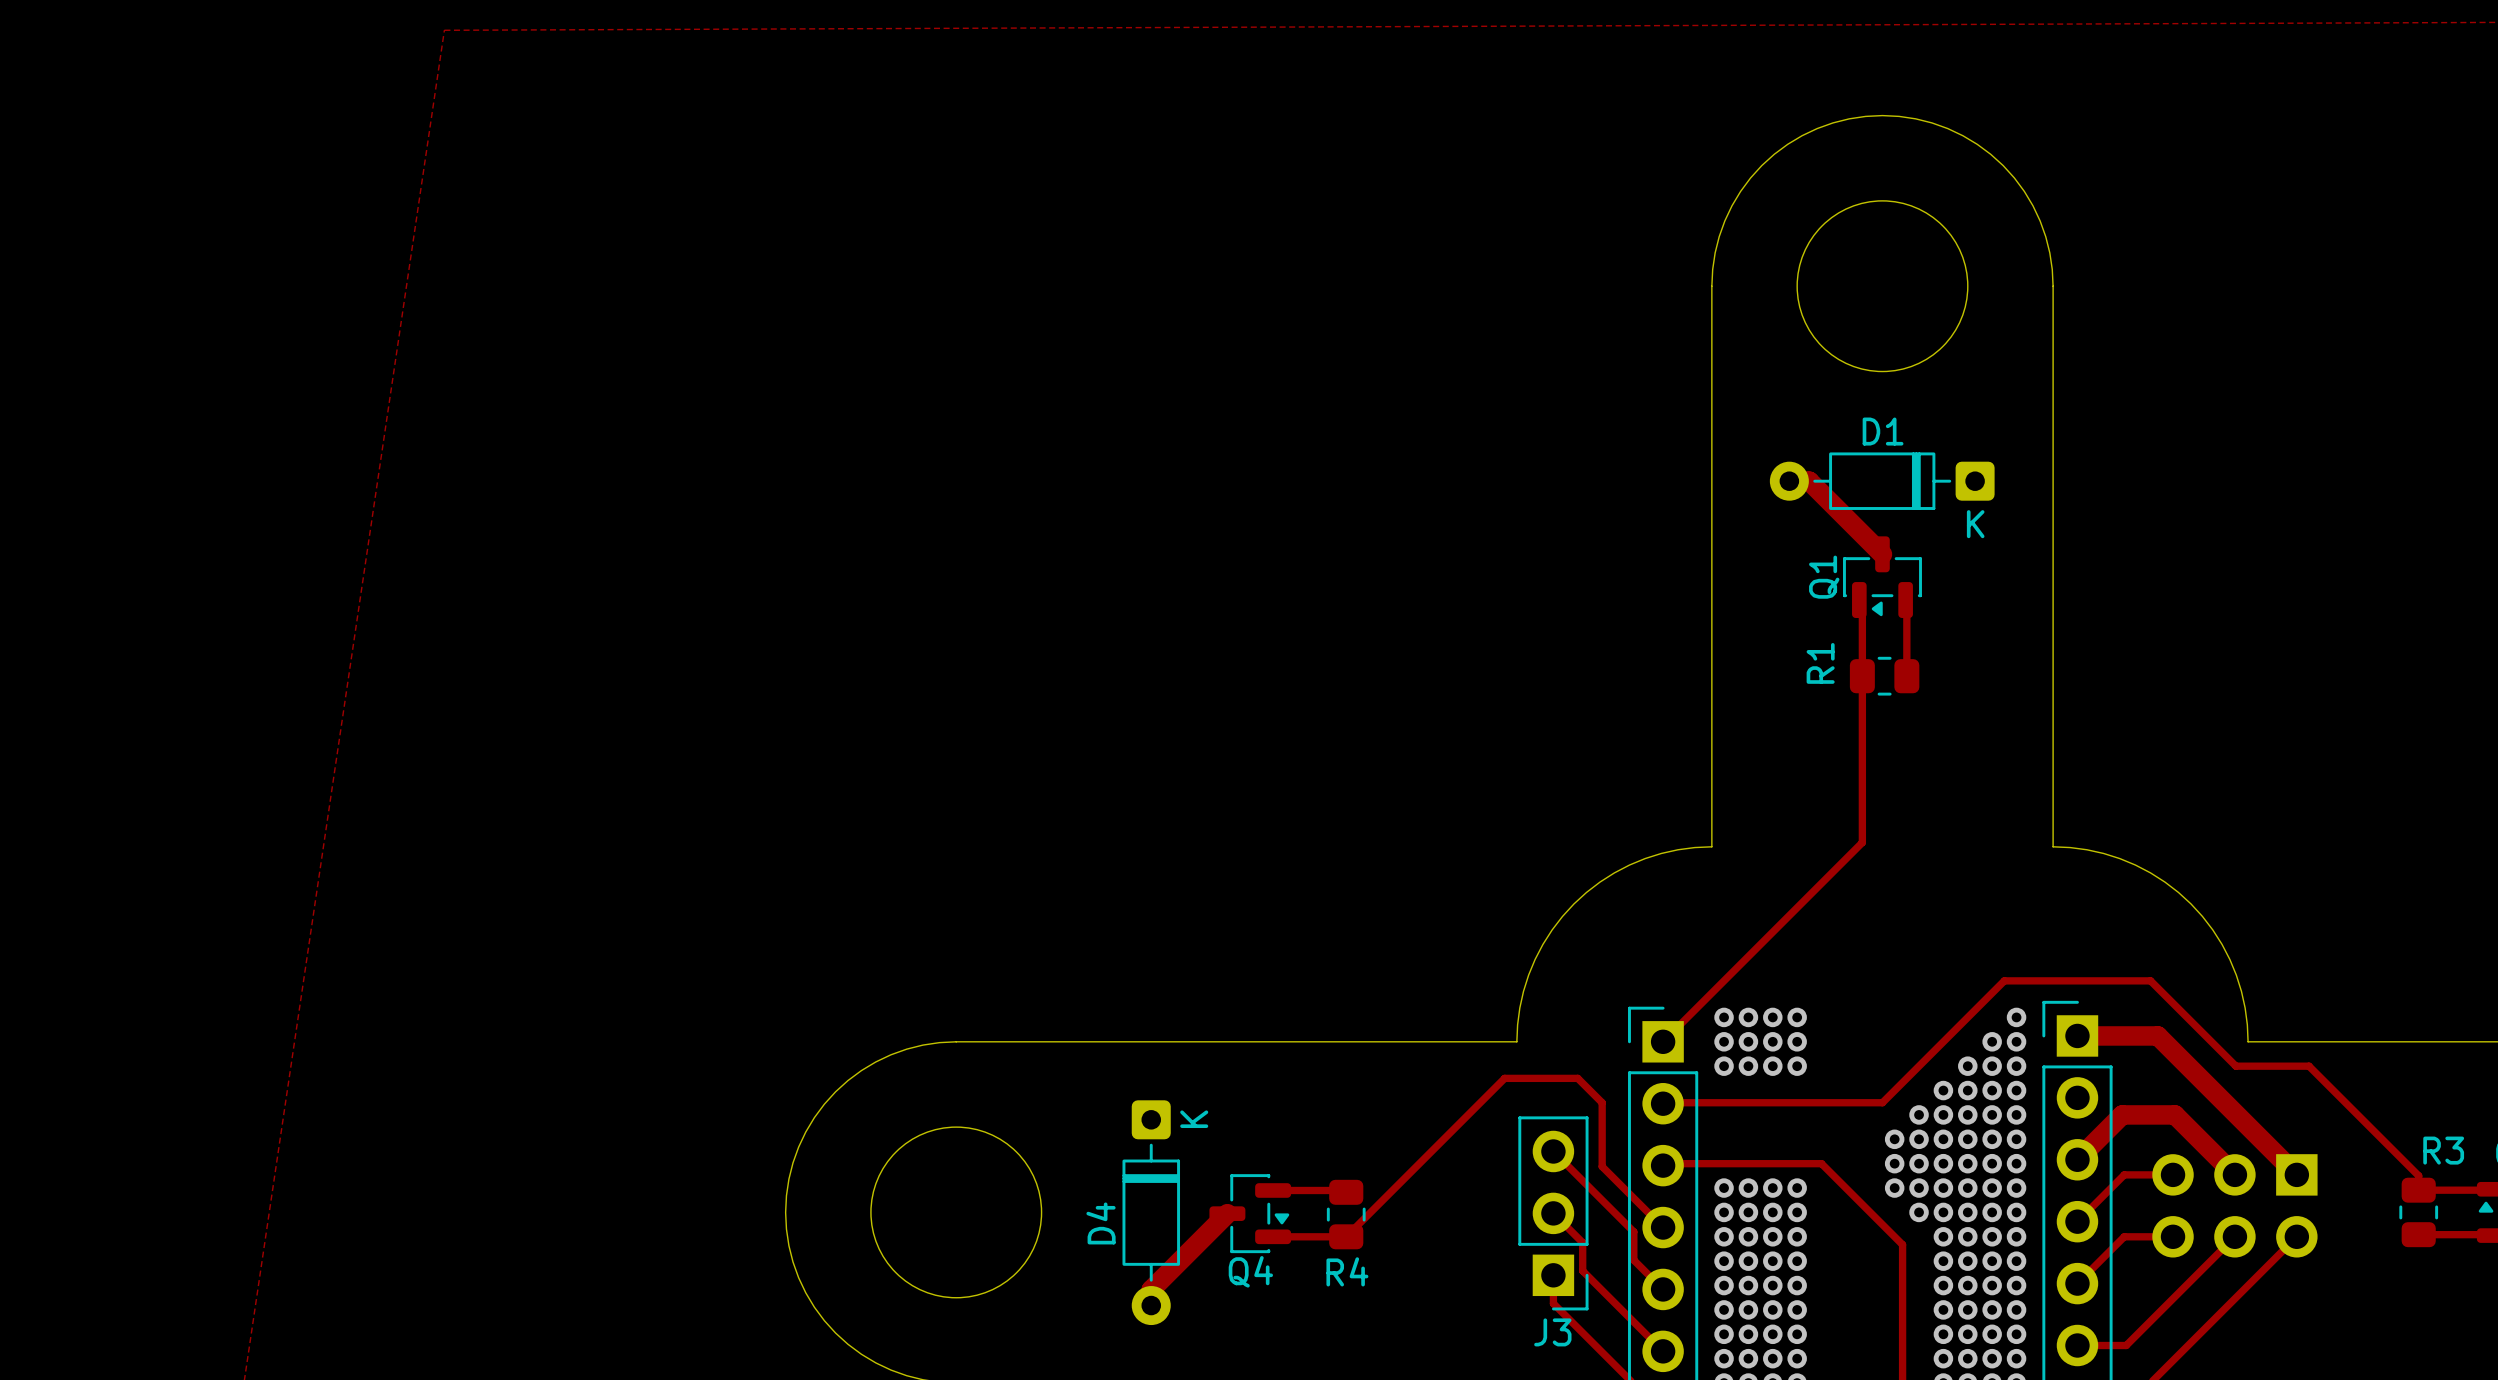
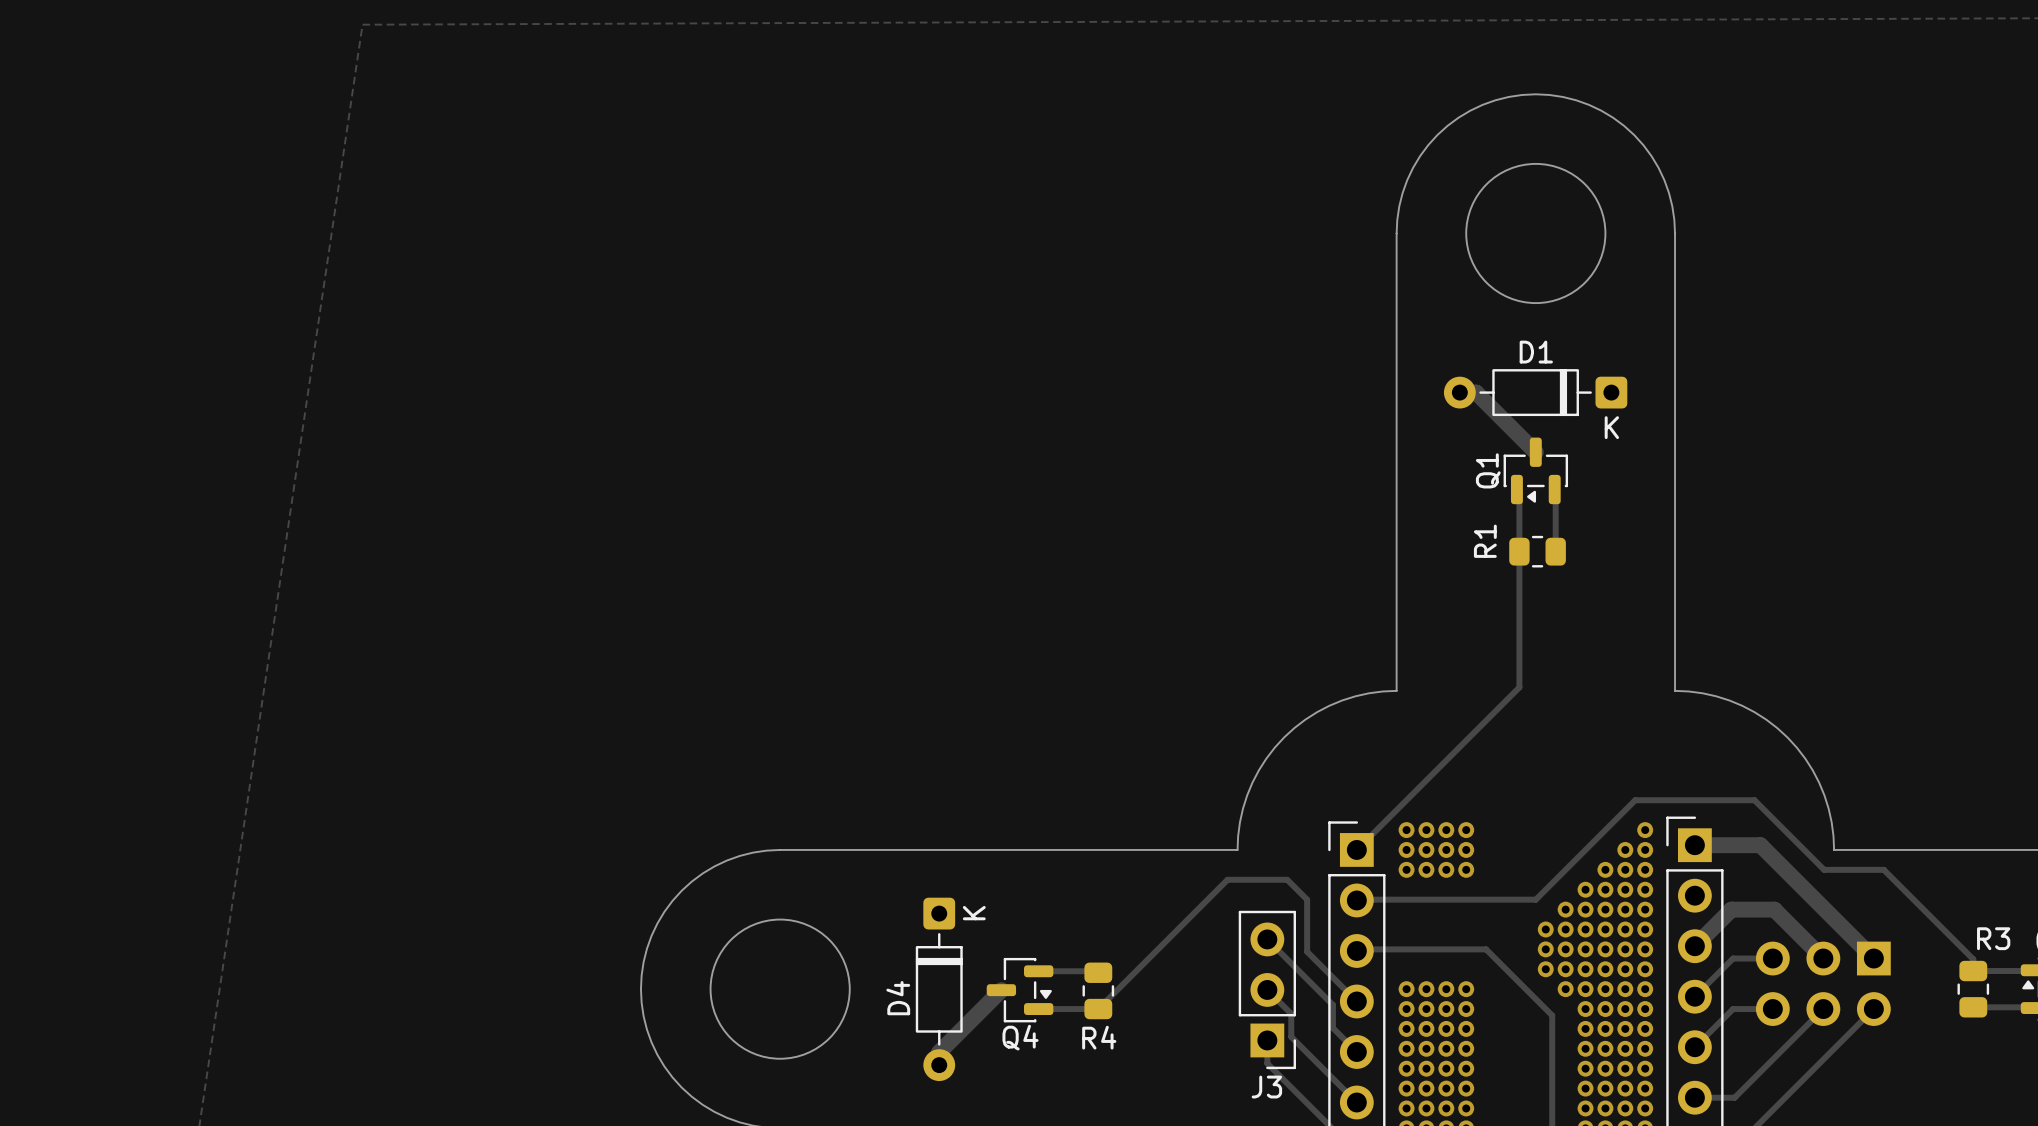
via: (1724, 1188) -> none
via: (1748, 1188) -> none
via: (1772, 1188) -> none
via: (1797, 1188) -> none

